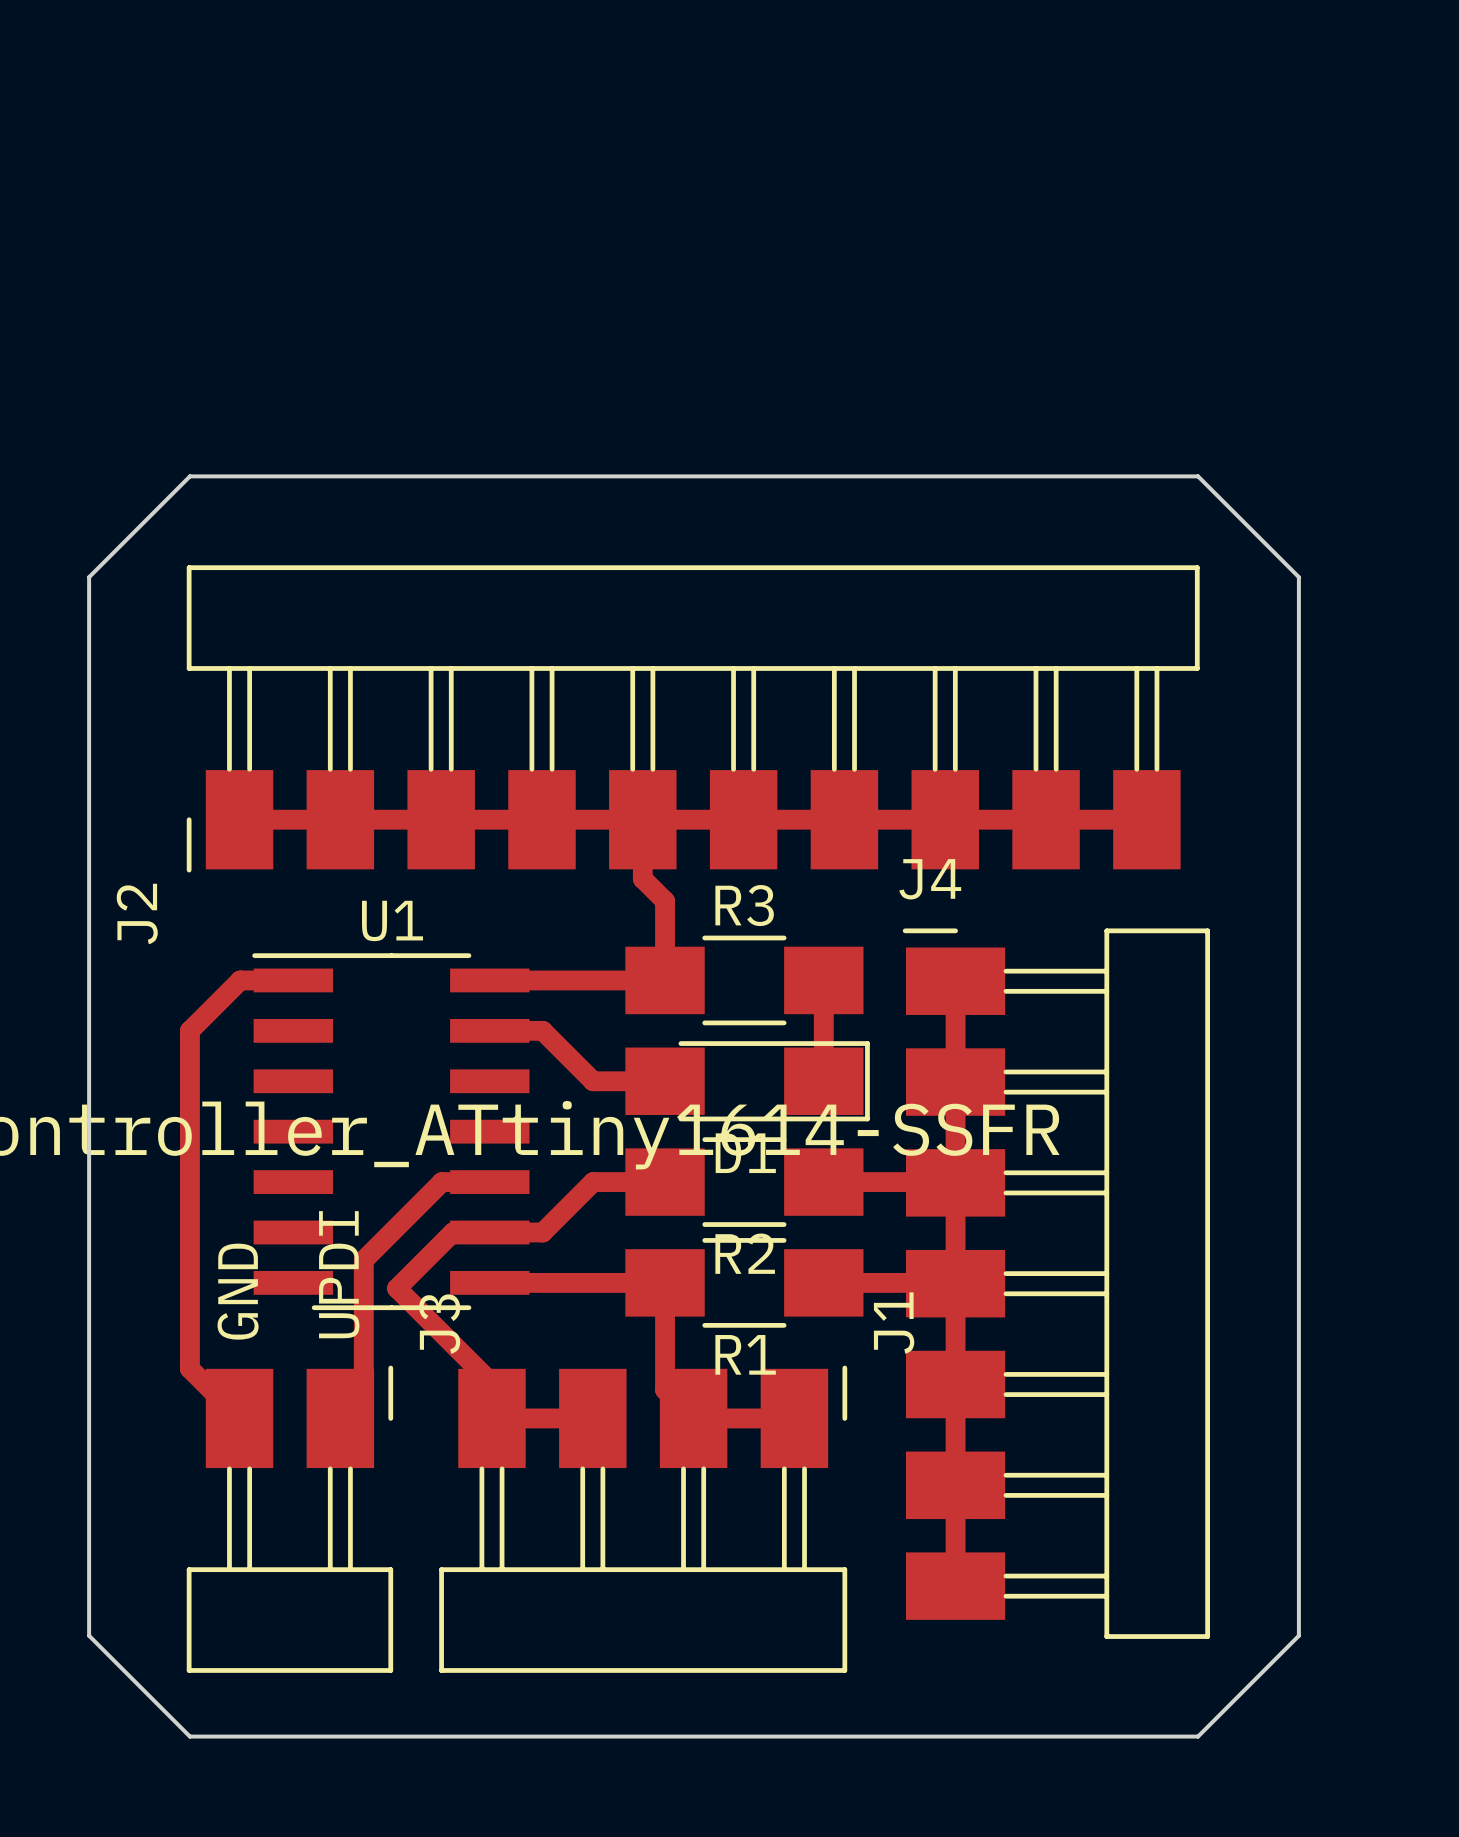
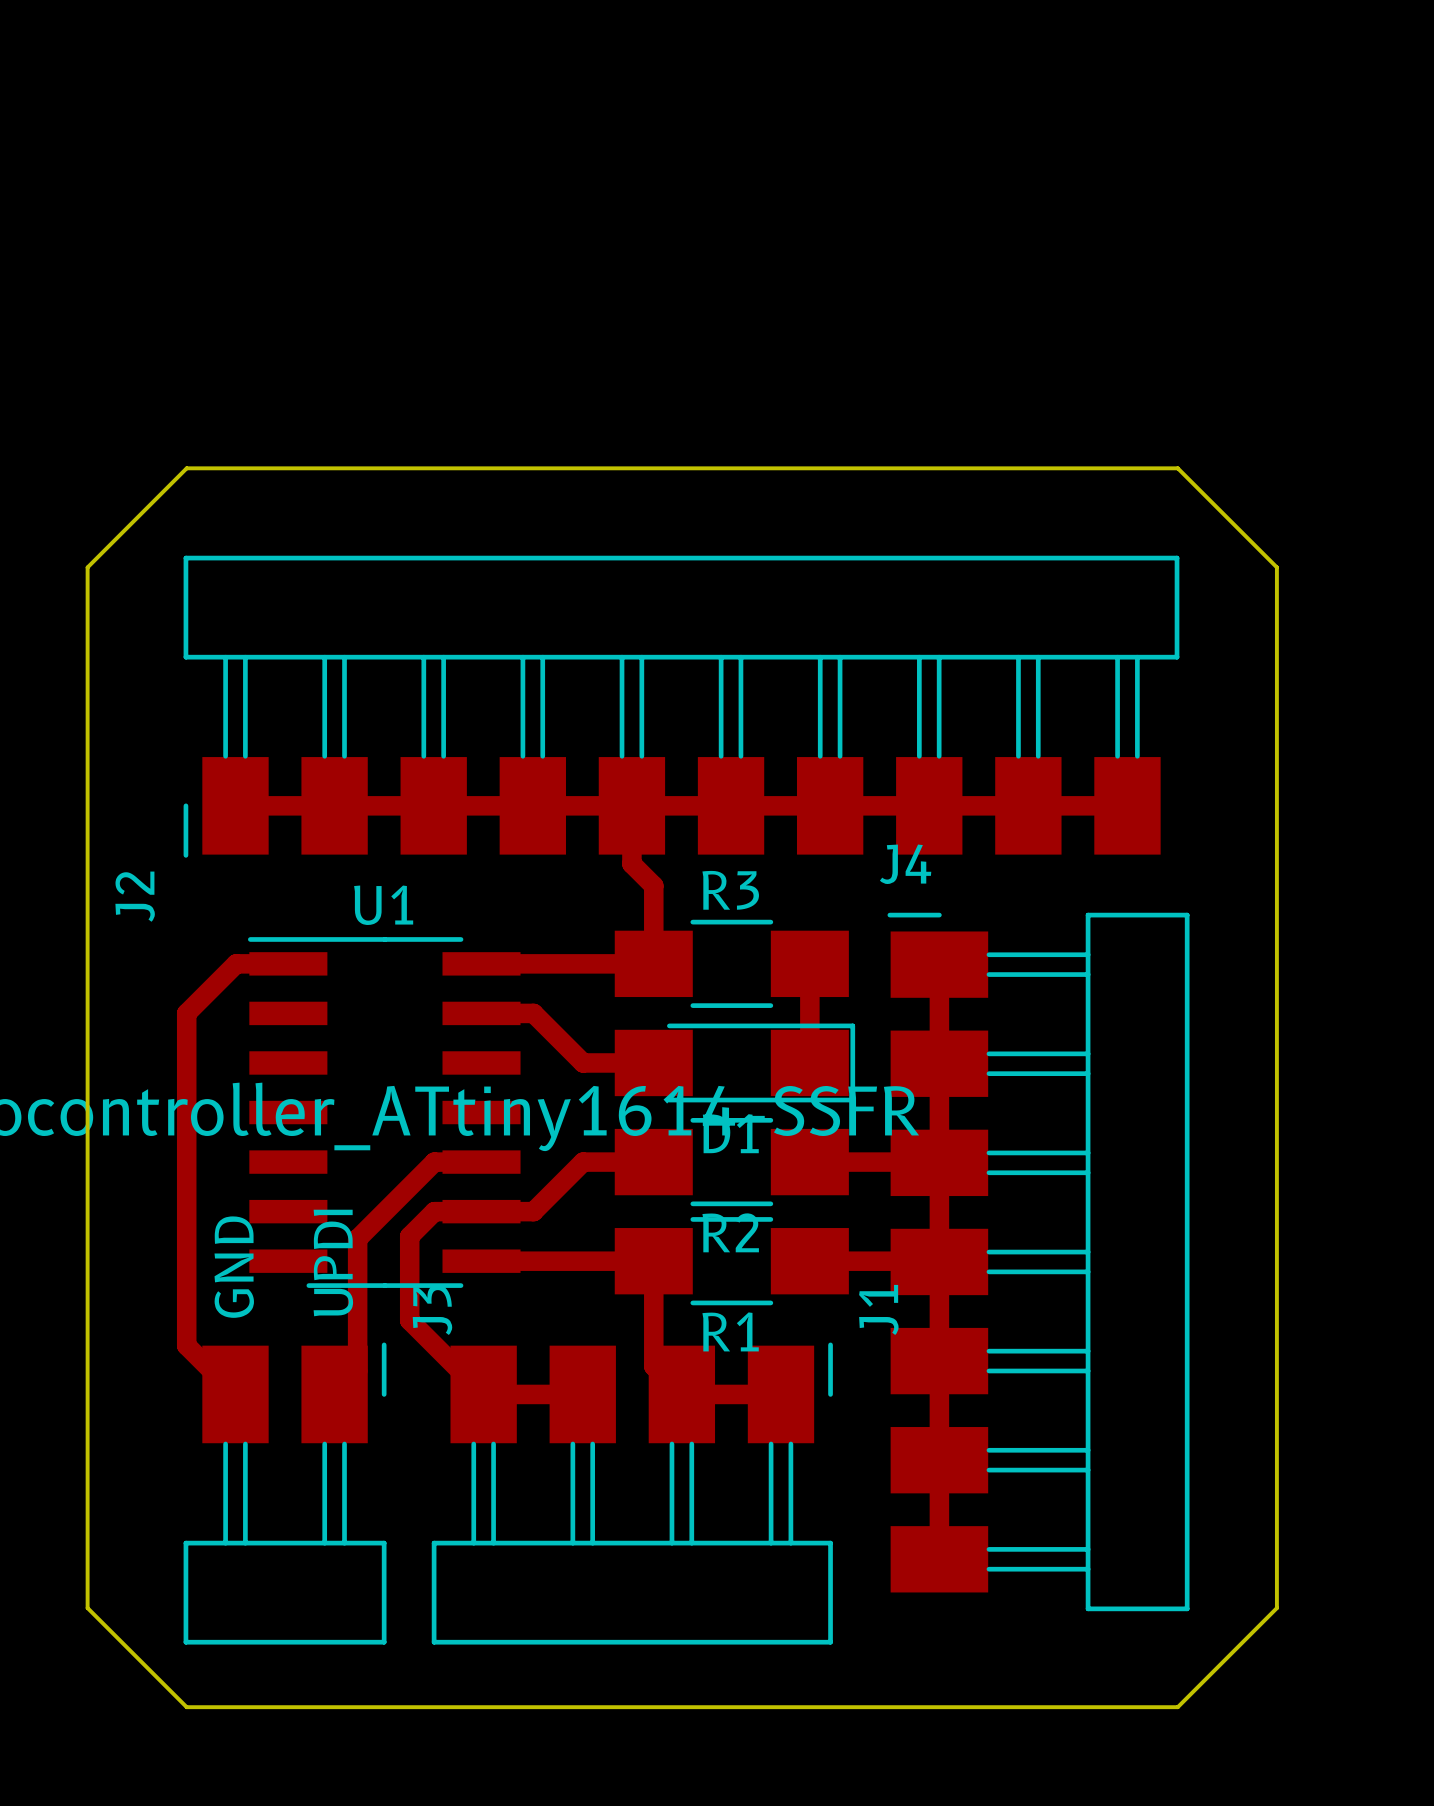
track: (452, 1232) (397, 1288) (491, 1383) -> (445, 1211) (434, 1211) (409, 1236) (409, 1320) (483, 1394)

